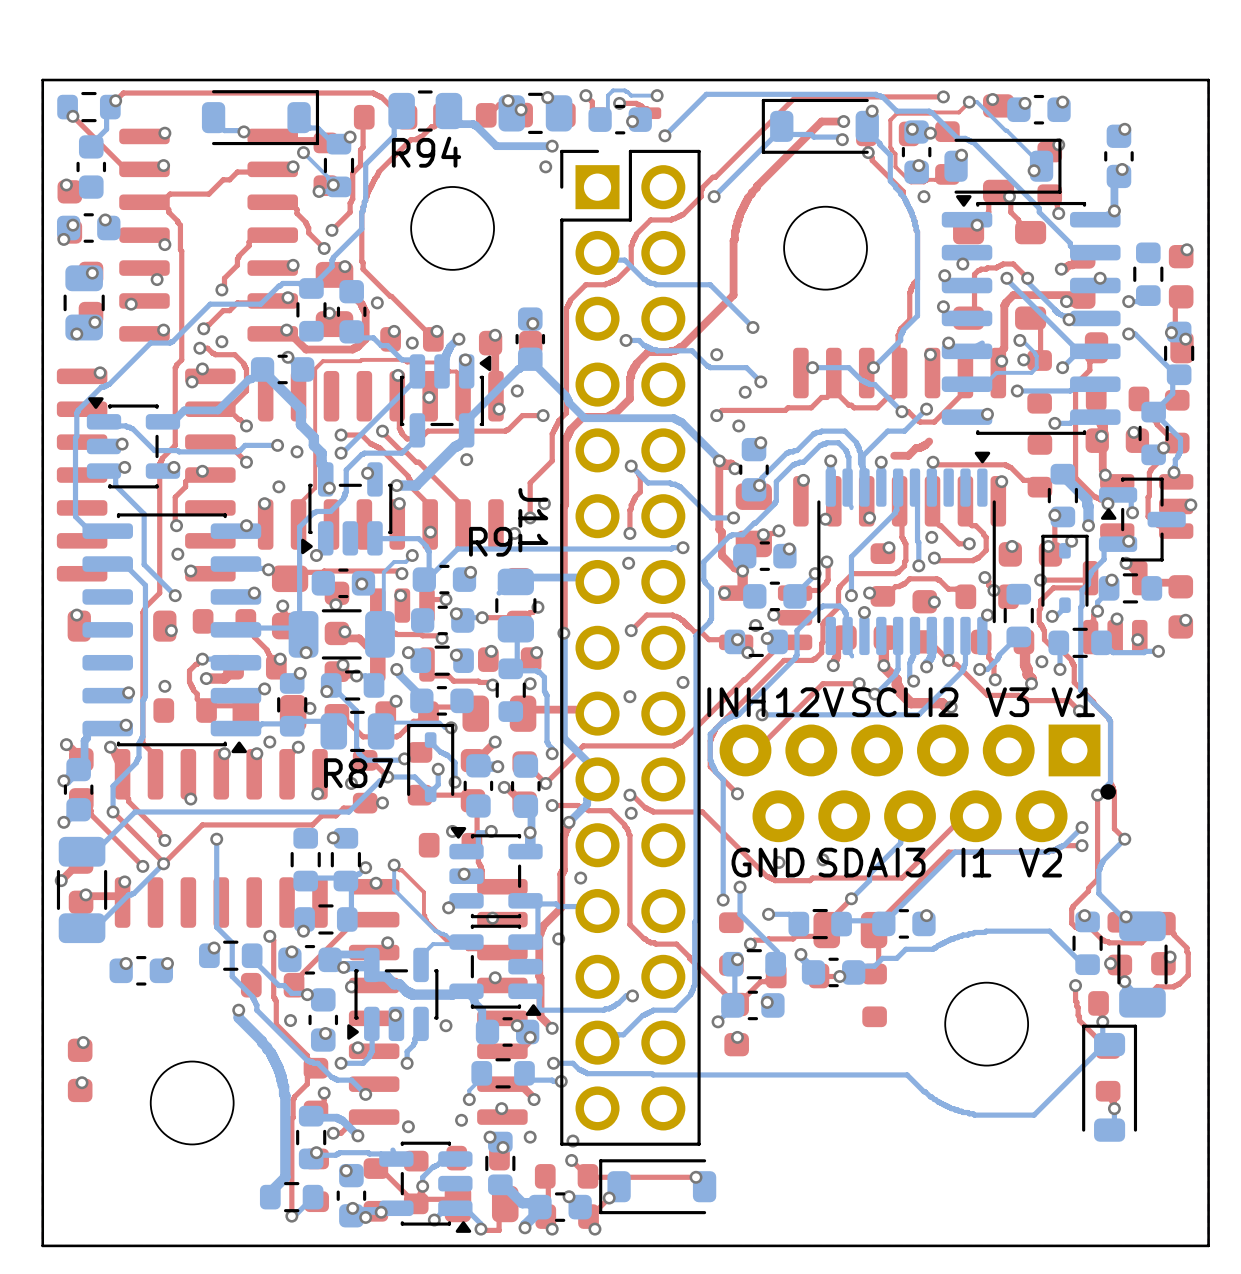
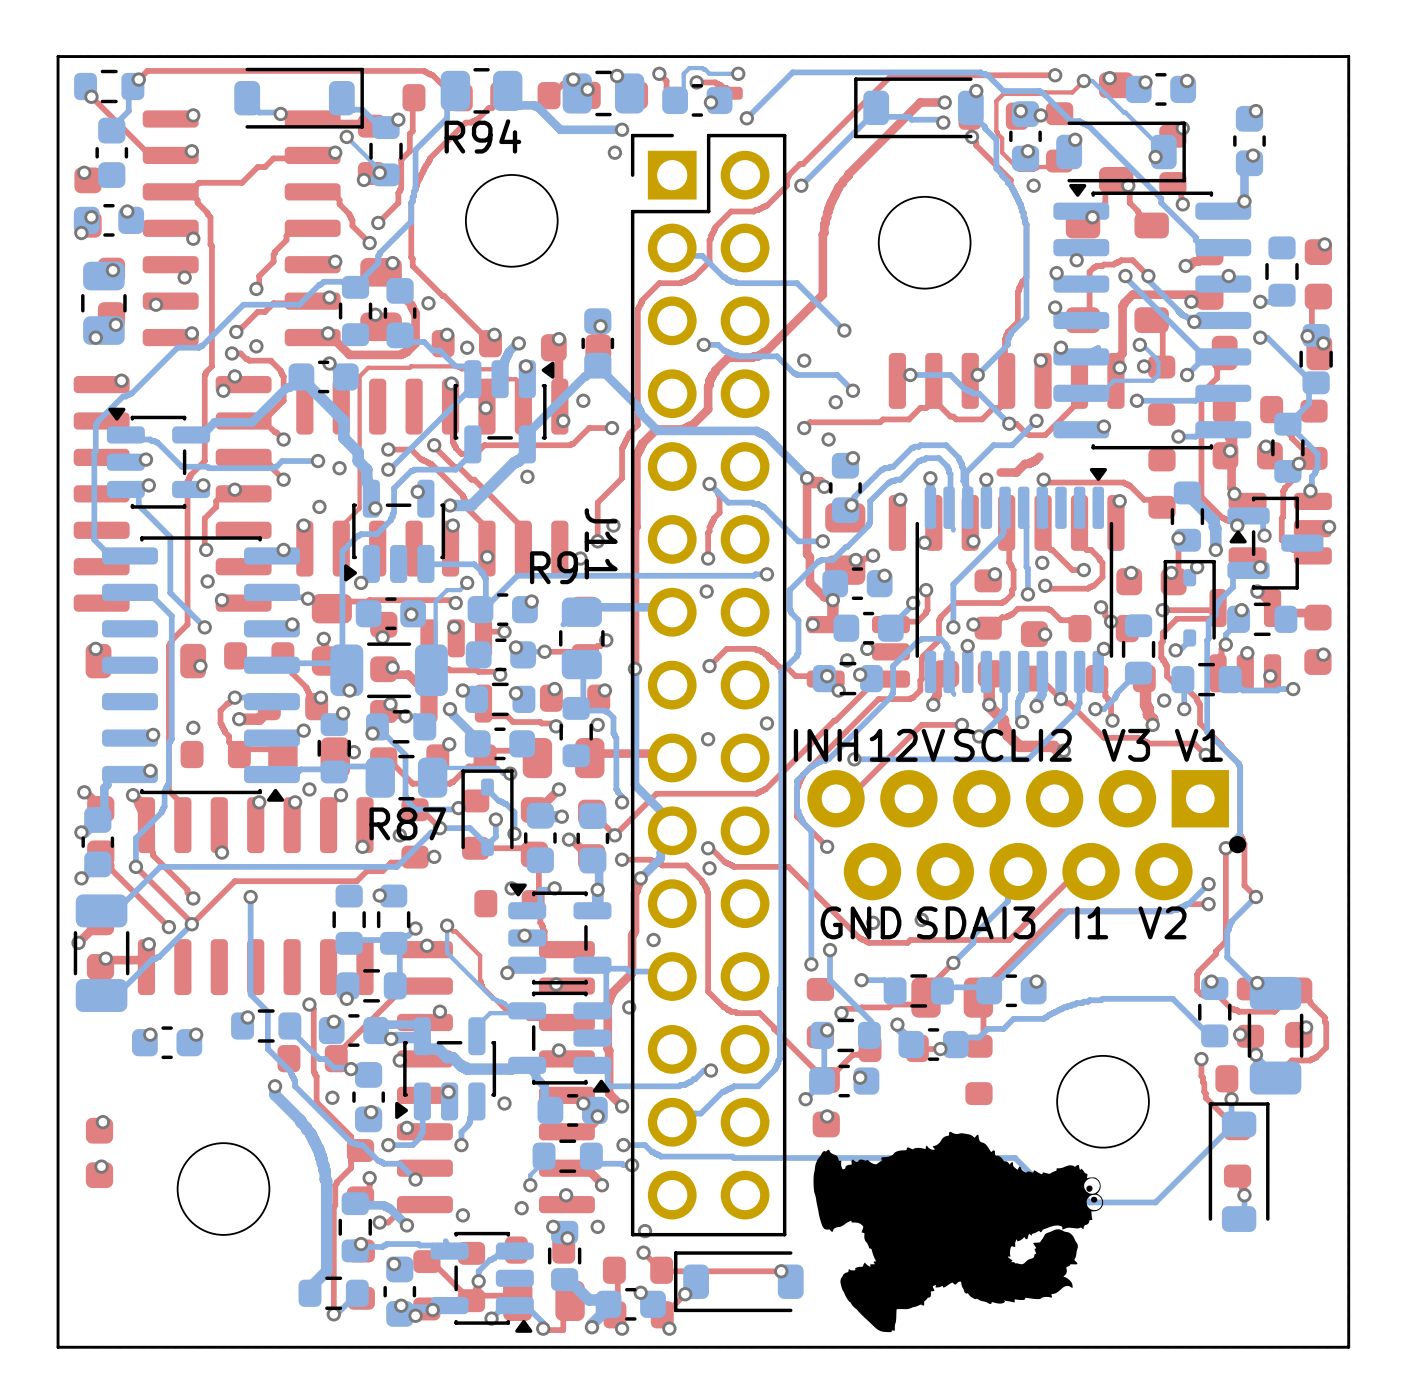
drawing: none -> [813, 1131, 1104, 1333]

